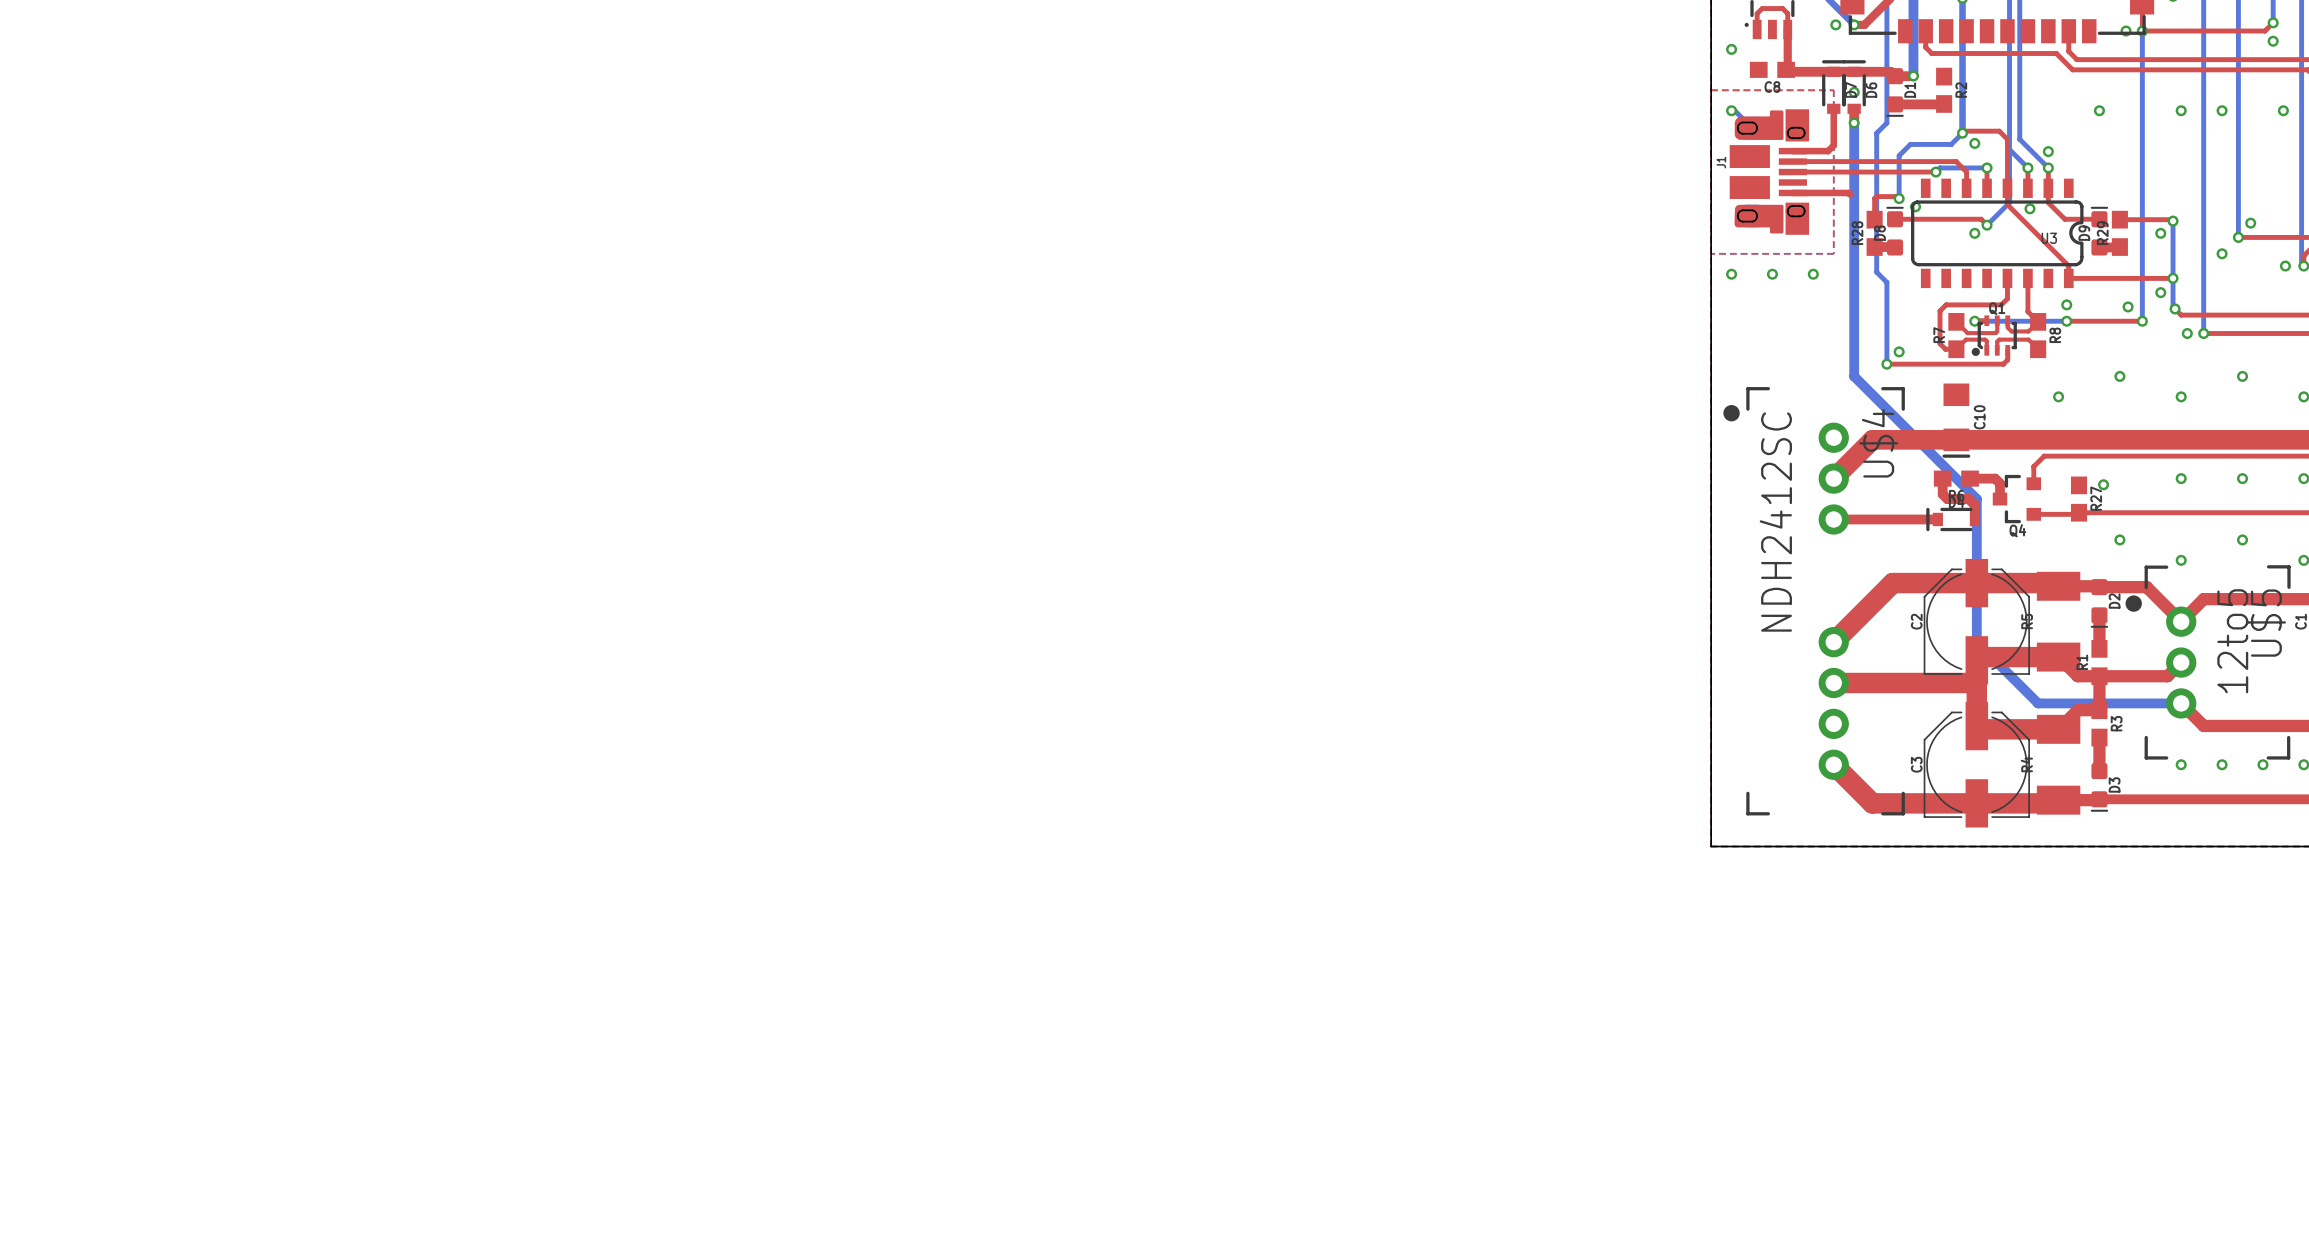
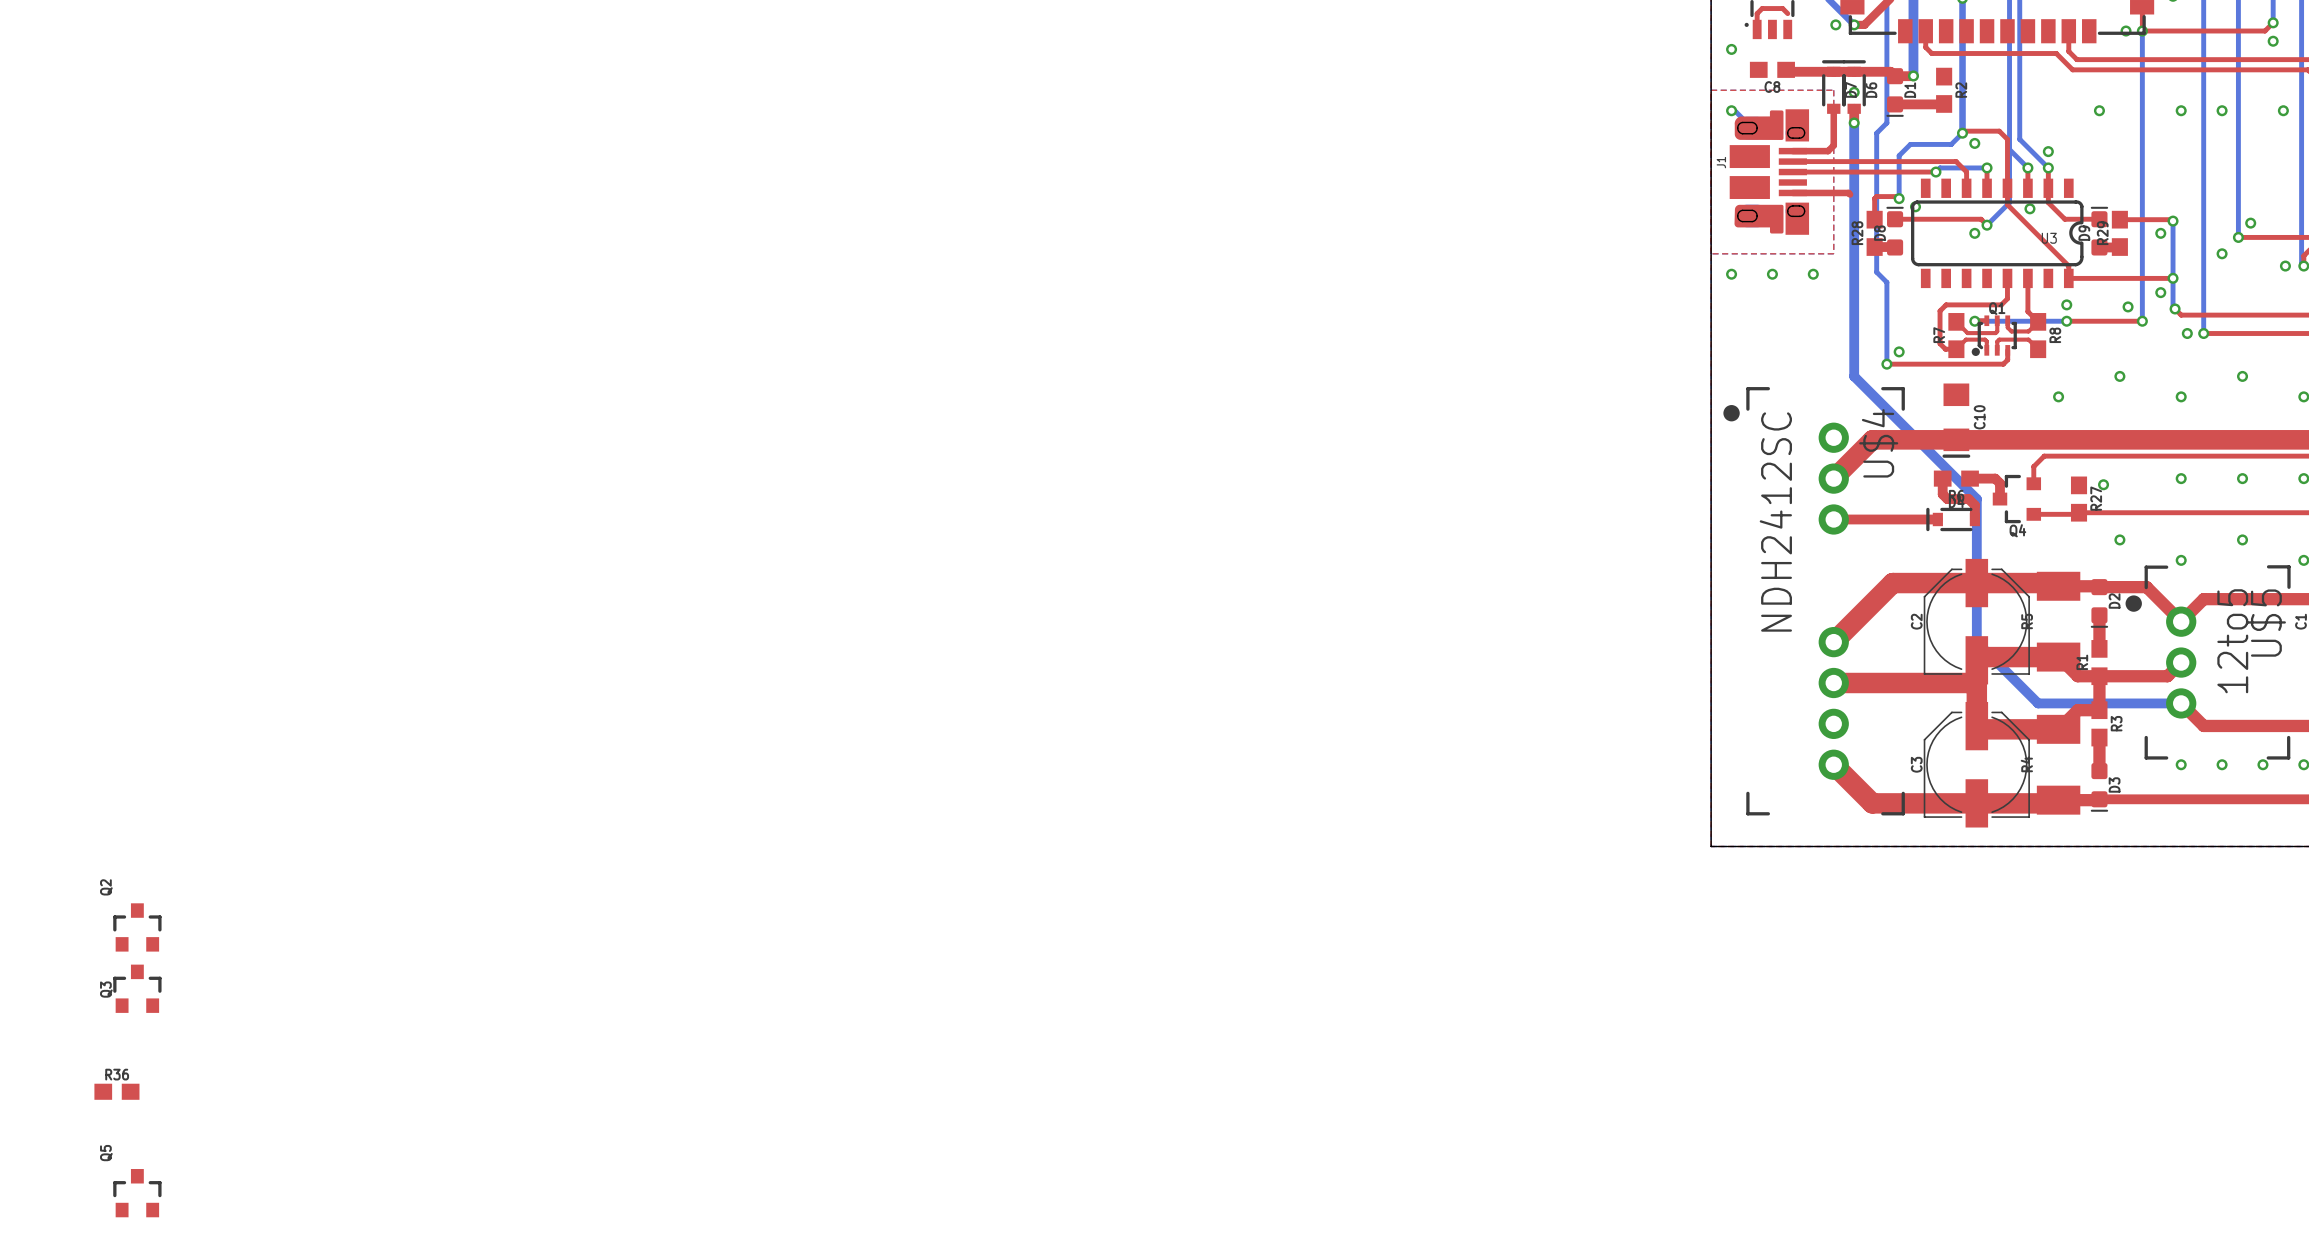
top track: (1787, 13) (1787, 68) -> none
Q2: none -> (137, 927)
Q3: none -> (137, 988)
R36: none -> (116, 1091)
Q5: none -> (137, 1193)

